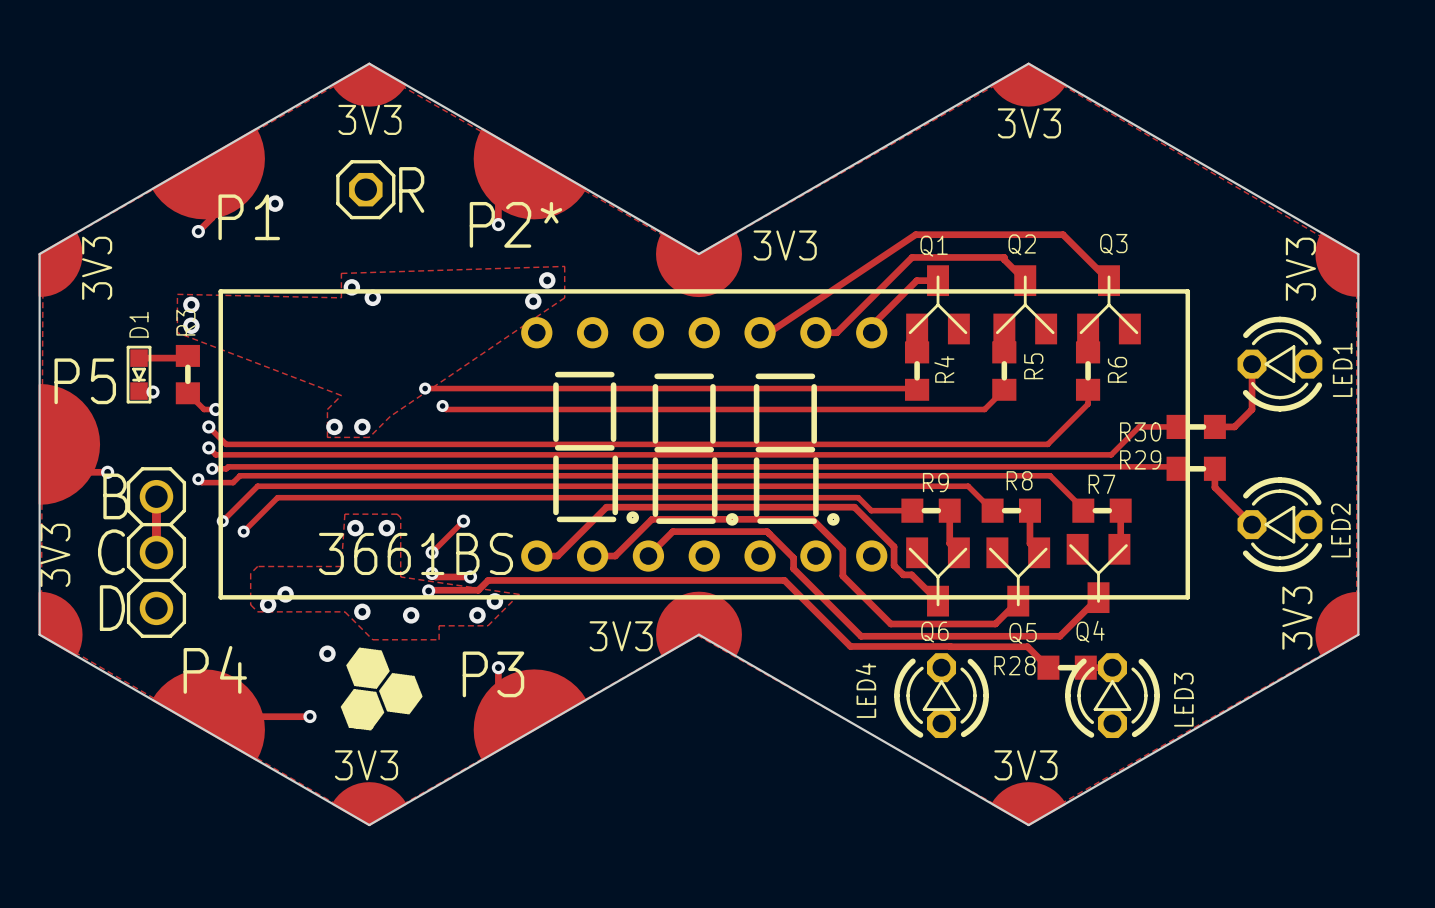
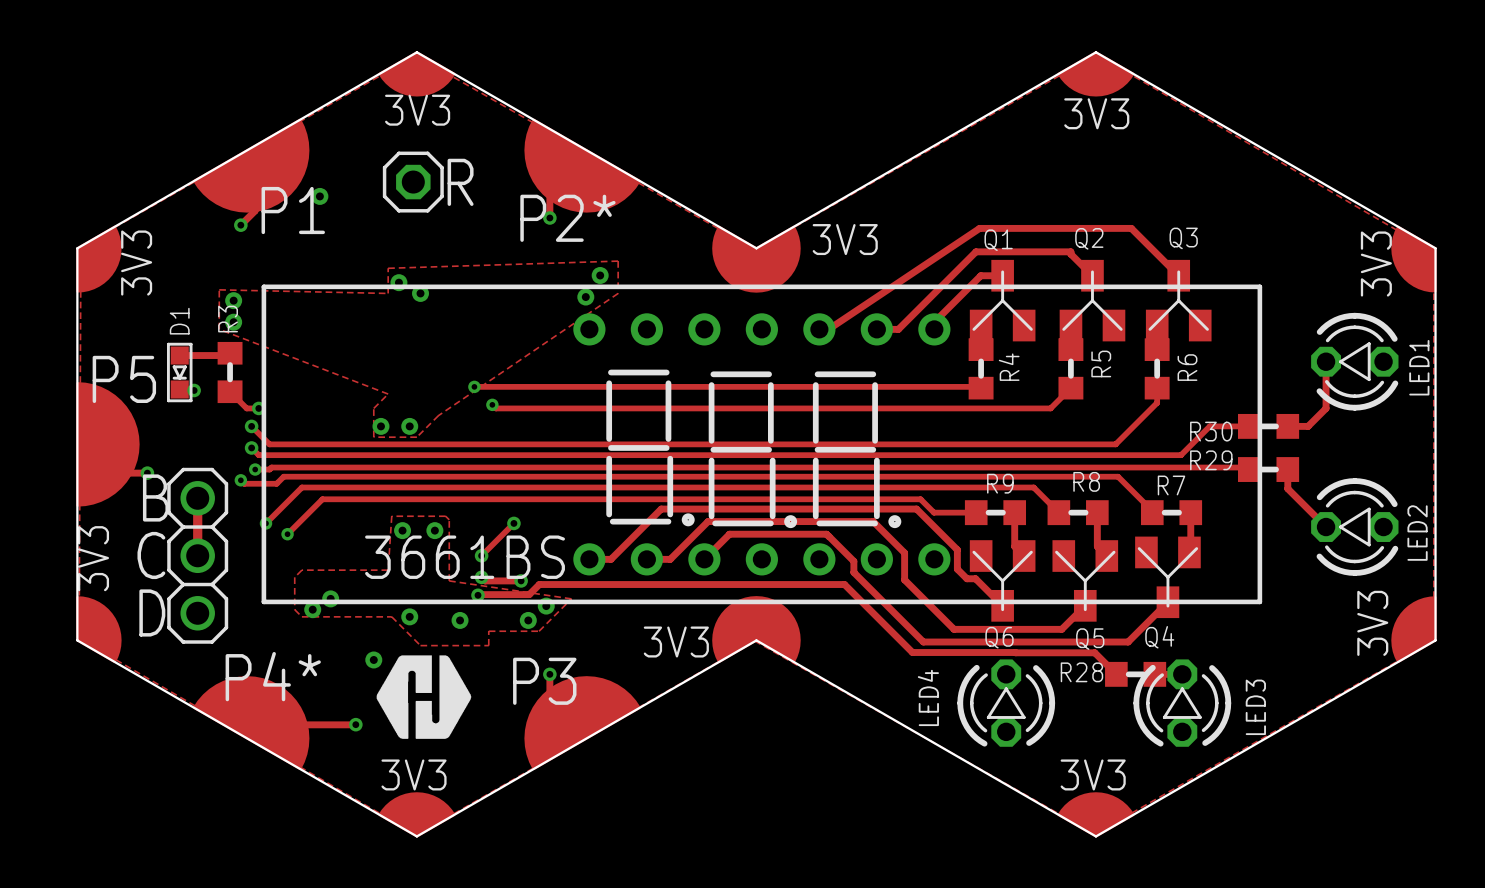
drawing: [340, 647, 423, 731] -> none
drawing: none -> [376, 655, 472, 739]
text: P4 (215, 669) -> P4* (273, 676)

